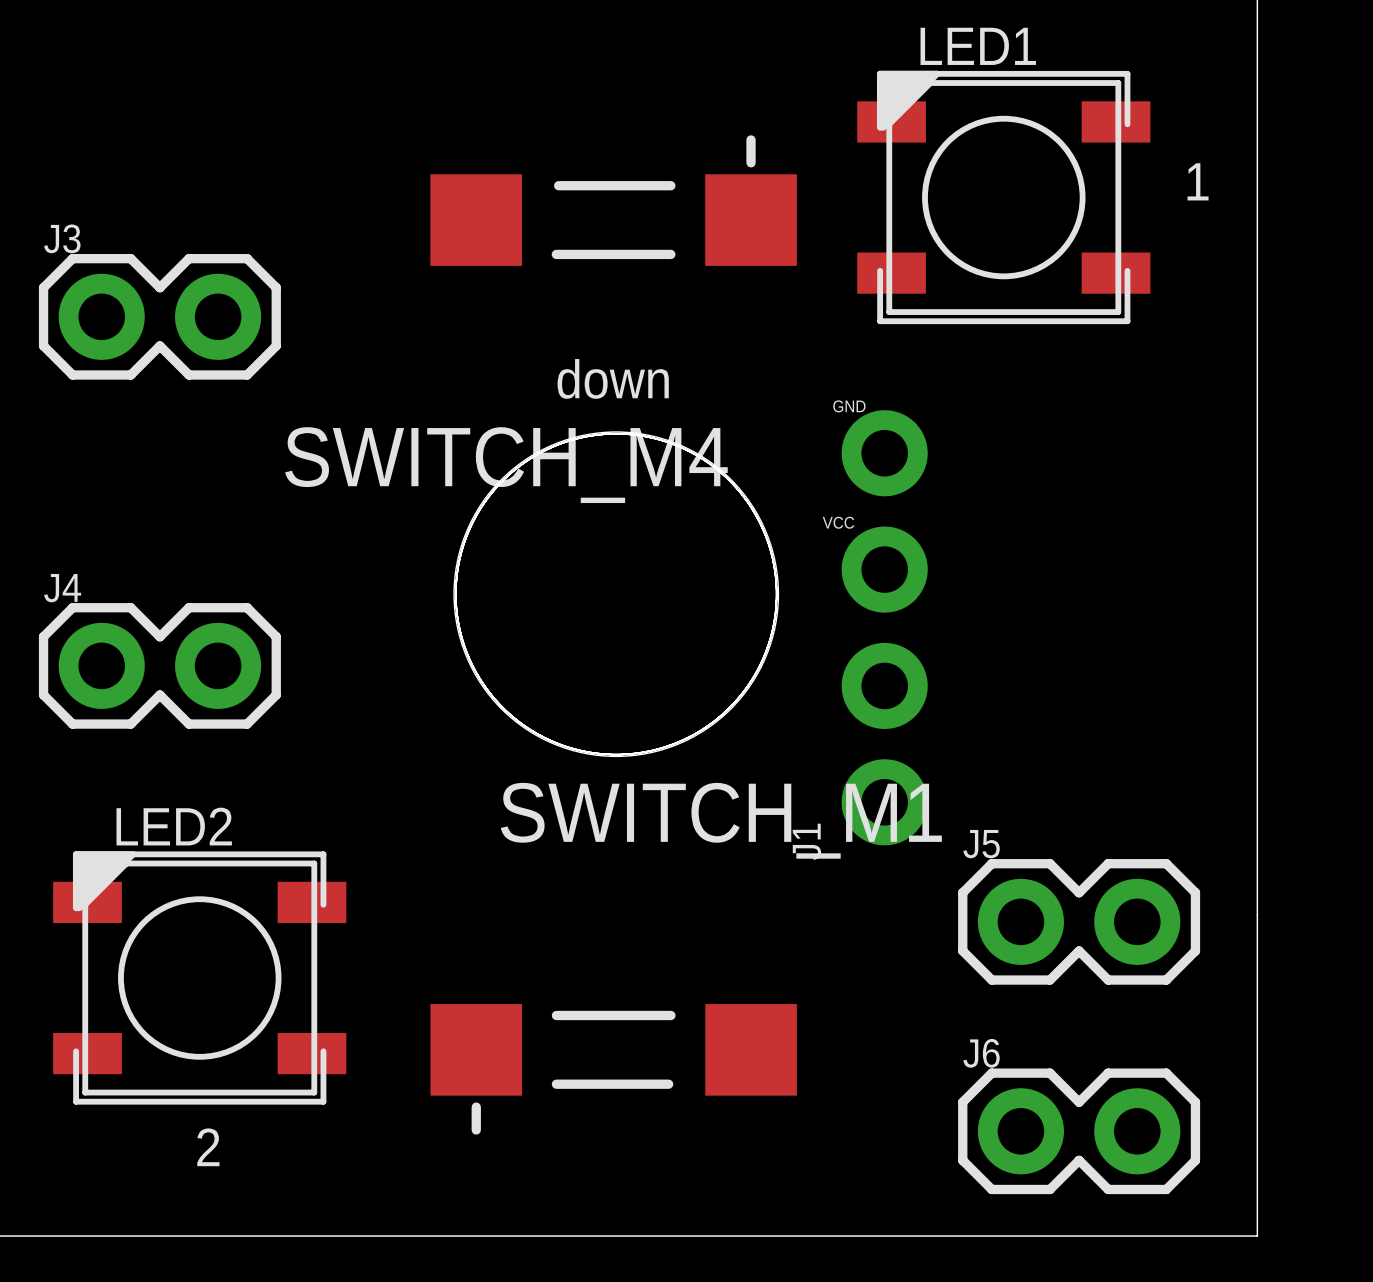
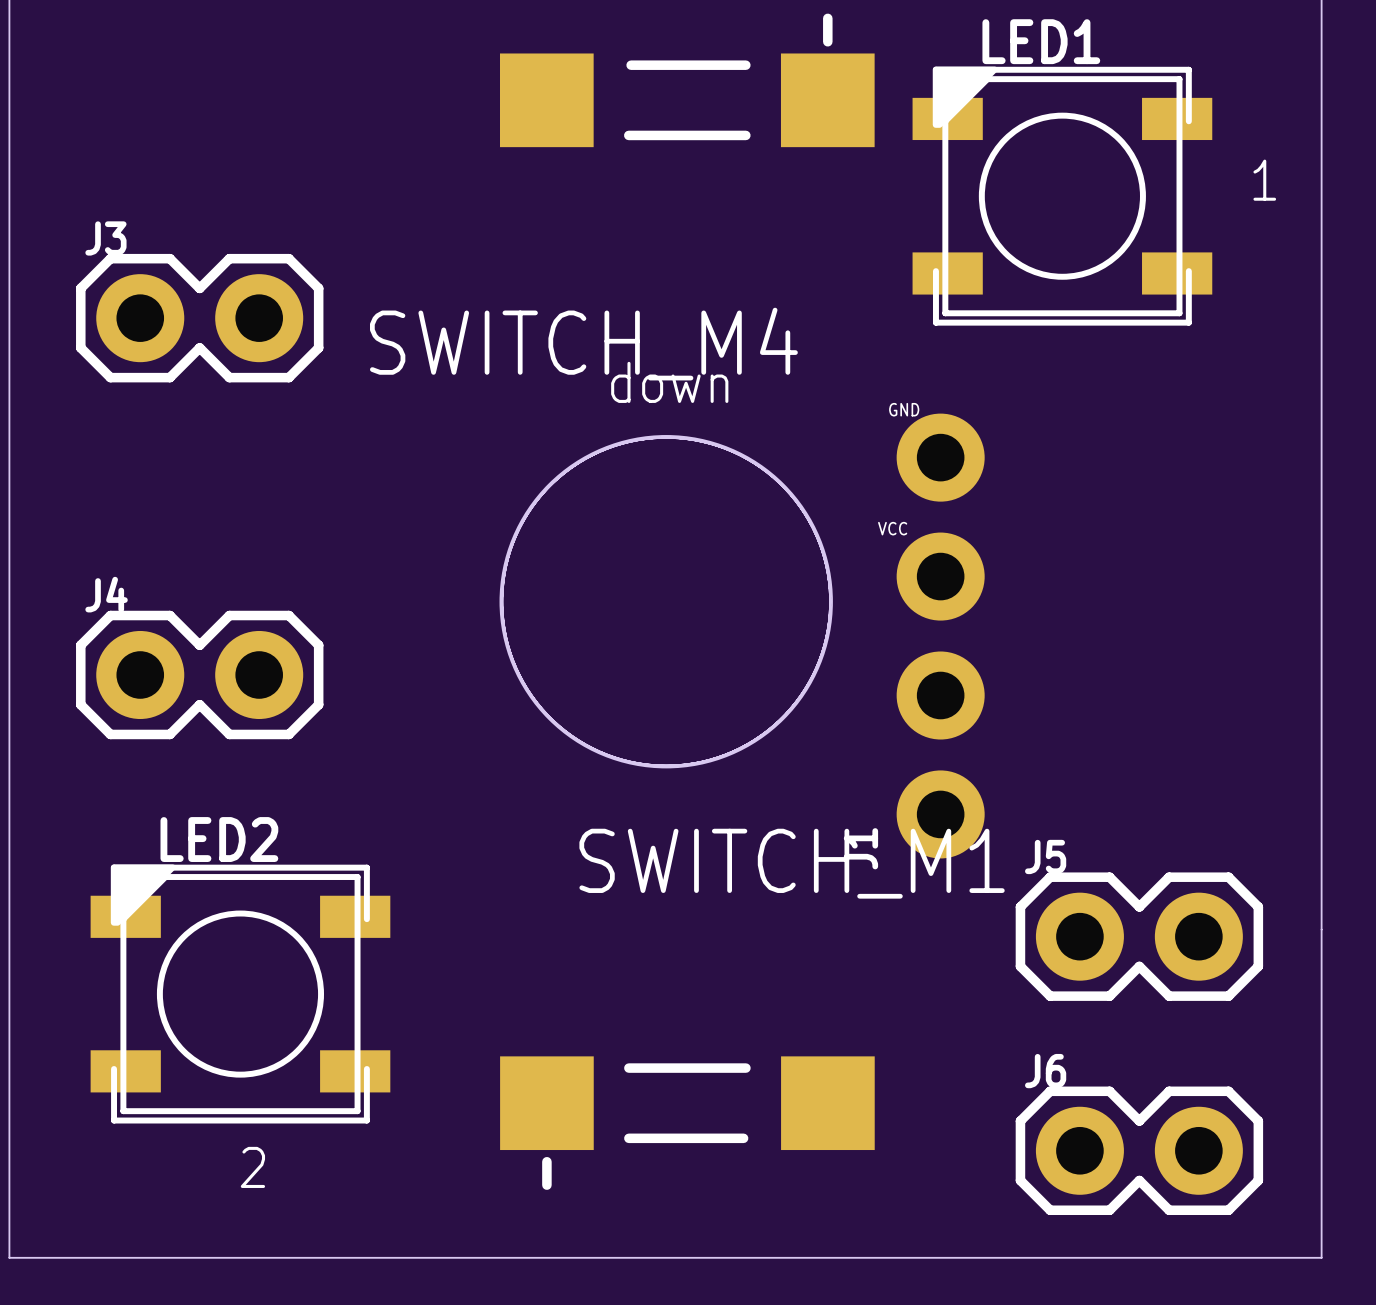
SWITCH_M4 position: (613, 200) -> (687, 80)
SWITCH_M1 position: (613, 1069) -> (687, 1123)

